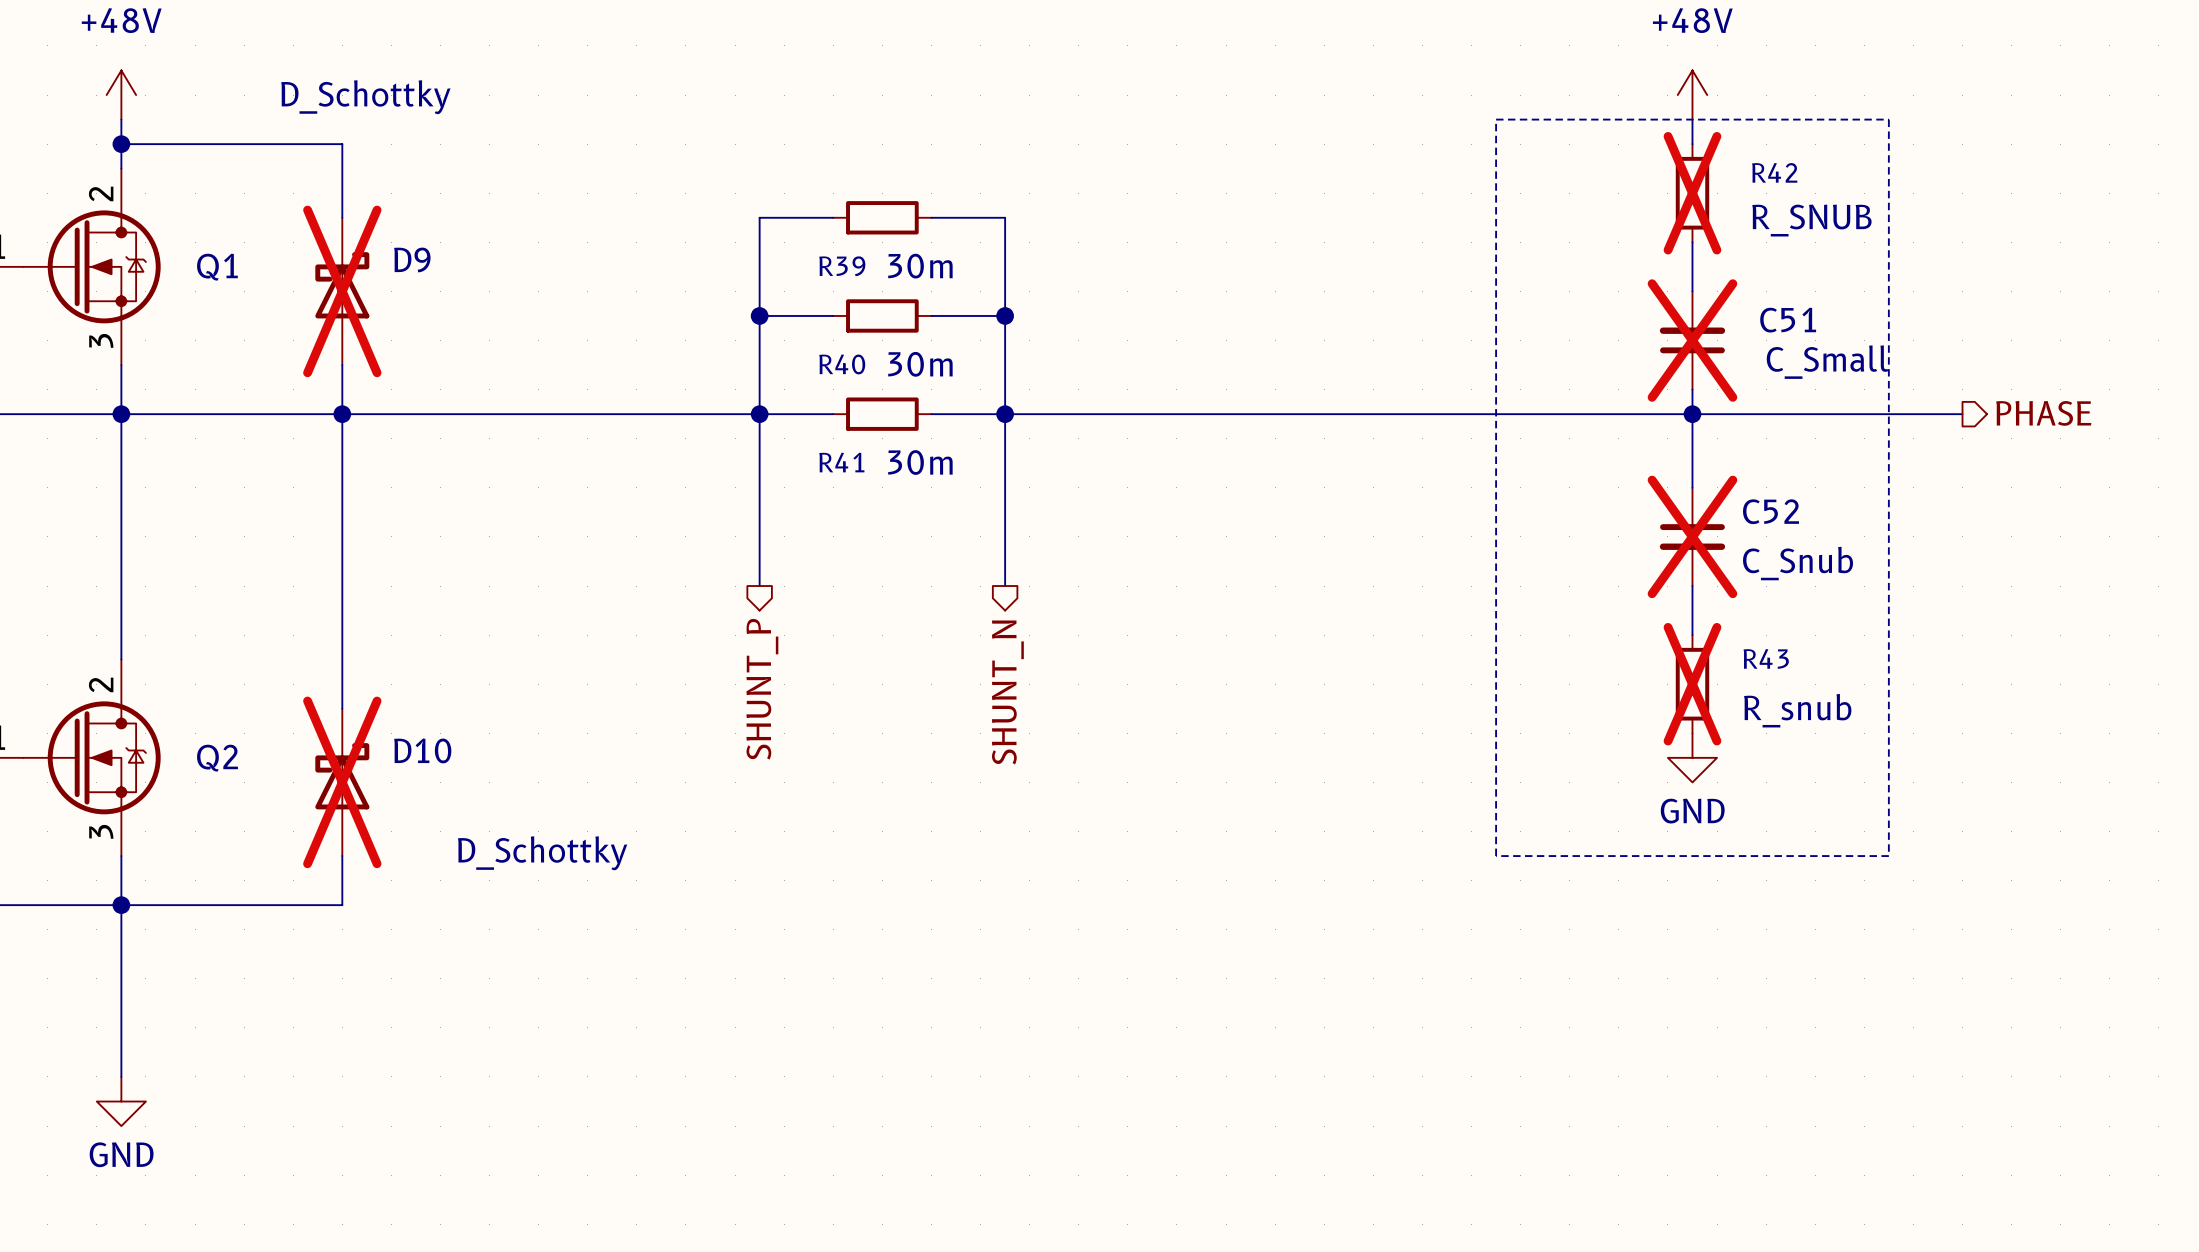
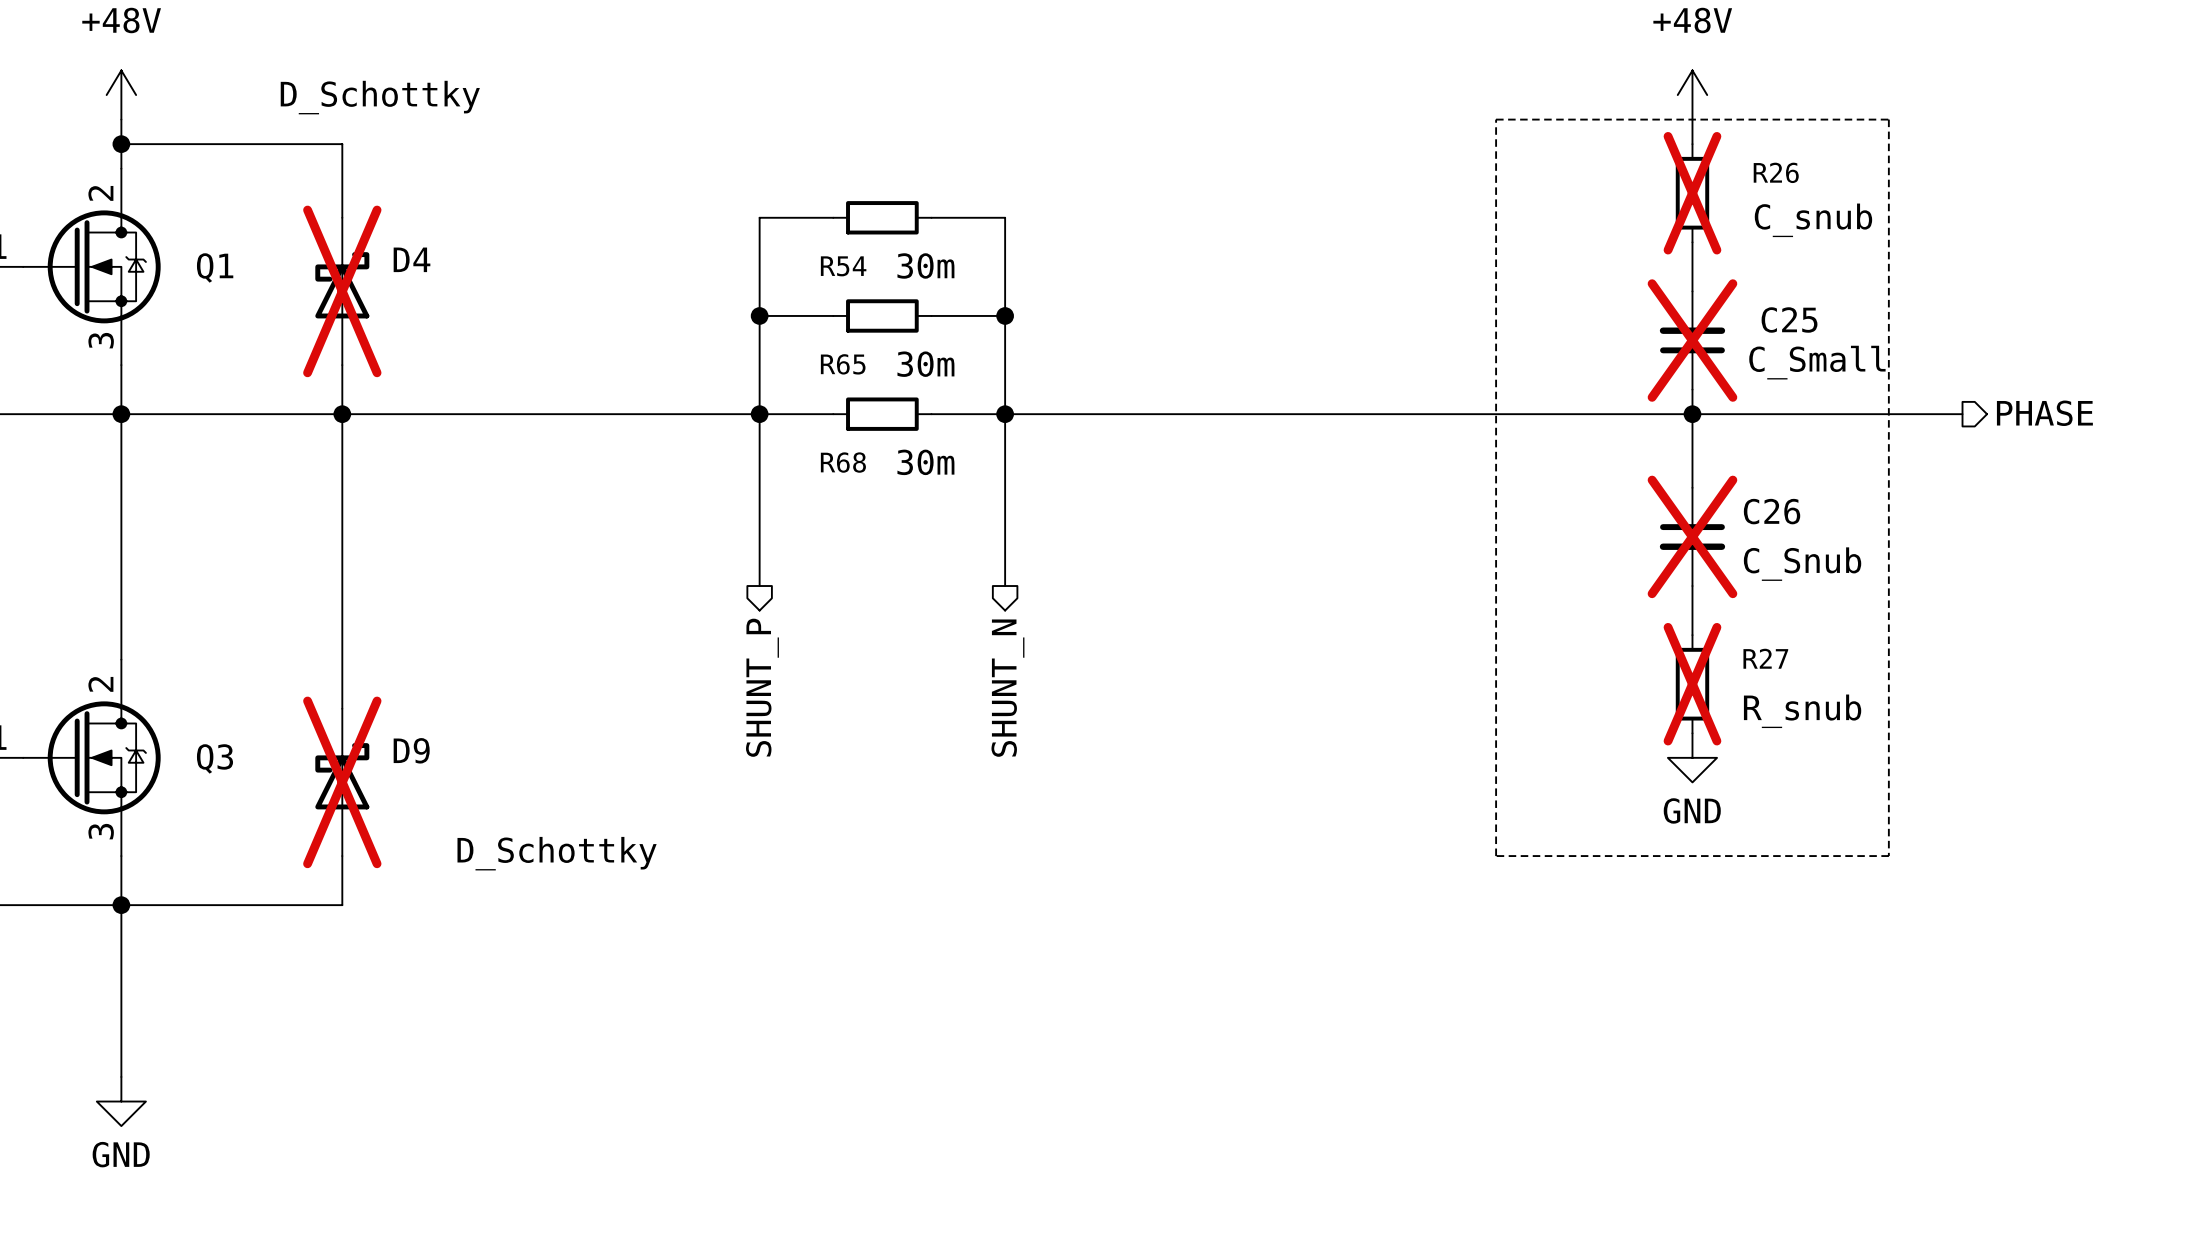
R42 name: R42 (1774, 172) -> R26 (1776, 172)
R42 value: R_SNUB (1811, 220) -> C_snub (1813, 220)
D9 name: D9 (412, 259) -> D4 (412, 259)
R39 name: R39 (842, 266) -> R54 (843, 266)
C51 name: C51 (1788, 320) -> C25 (1789, 319)
R40 name: R40 (842, 364) -> R65 (843, 364)
R41 name: R41 (841, 462) -> R68 (843, 462)
C52 name: C52 (1771, 511) -> C26 (1772, 511)
R43 name: R43 (1766, 658) -> R27 (1765, 658)
D10 name: D10 (422, 750) -> D9 (411, 750)
Q2 name: Q2 (217, 758) -> Q3 (214, 758)

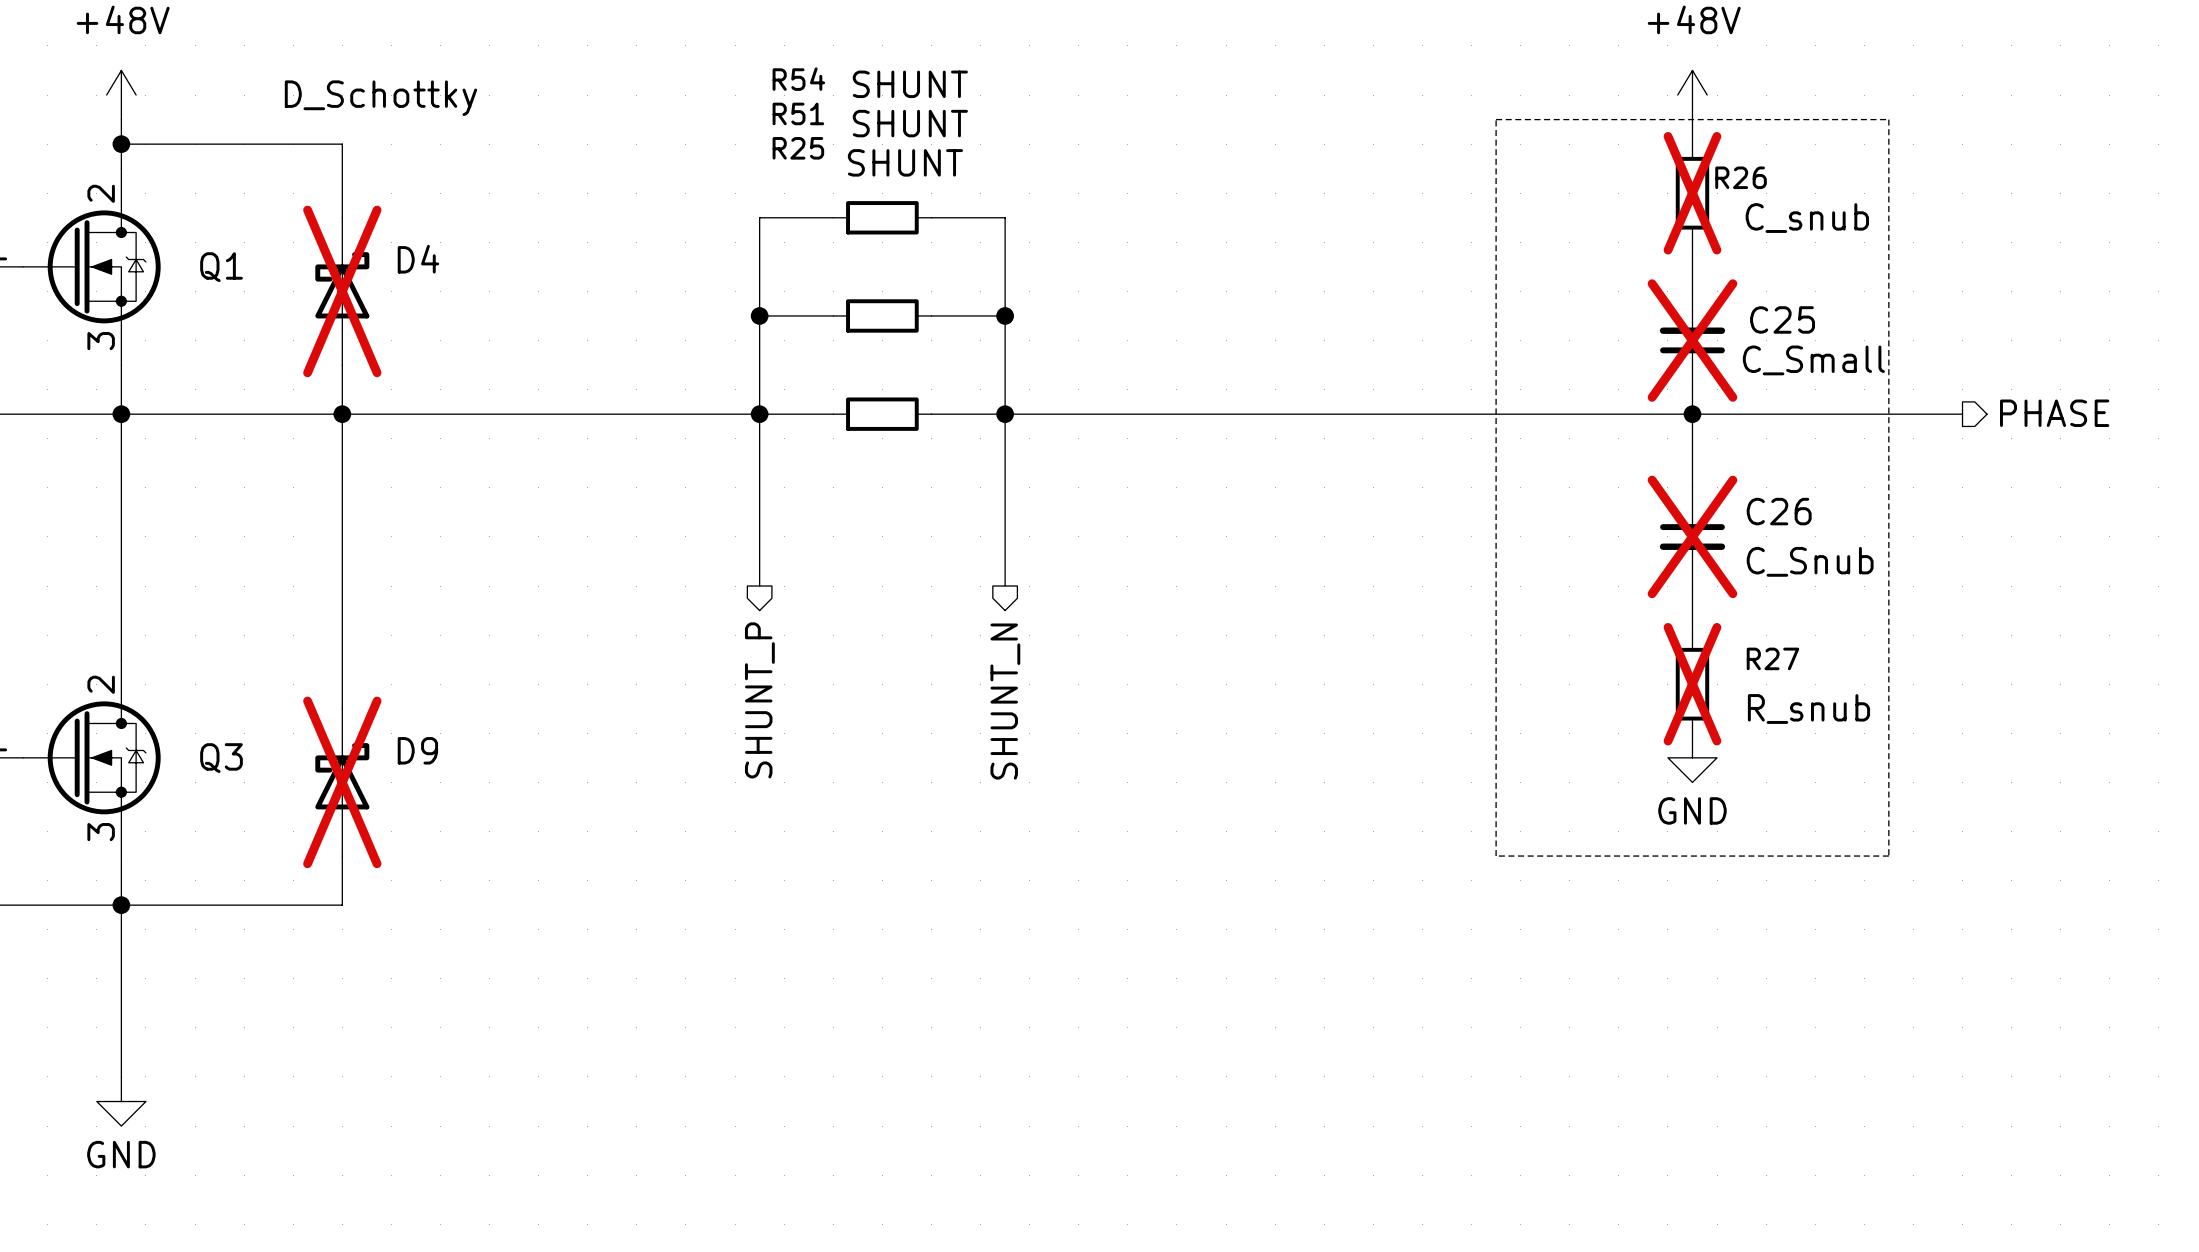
R26 name position: R26 (1776, 172) -> R26 (1741, 177)
R54 value: 30m (925, 265) -> SHUNT (910, 84)
R54 name position: R54 (843, 266) -> R54 (798, 79)
R65 name: R65 (843, 364) -> R51 (798, 113)
R65 value: 30m (925, 364) -> SHUNT (910, 123)
R68 name: R68 (843, 462) -> R25 (798, 148)
R68 value: 30m (925, 462) -> SHUNT (905, 162)
D9 value: D_Schottky (557, 853) -> none

